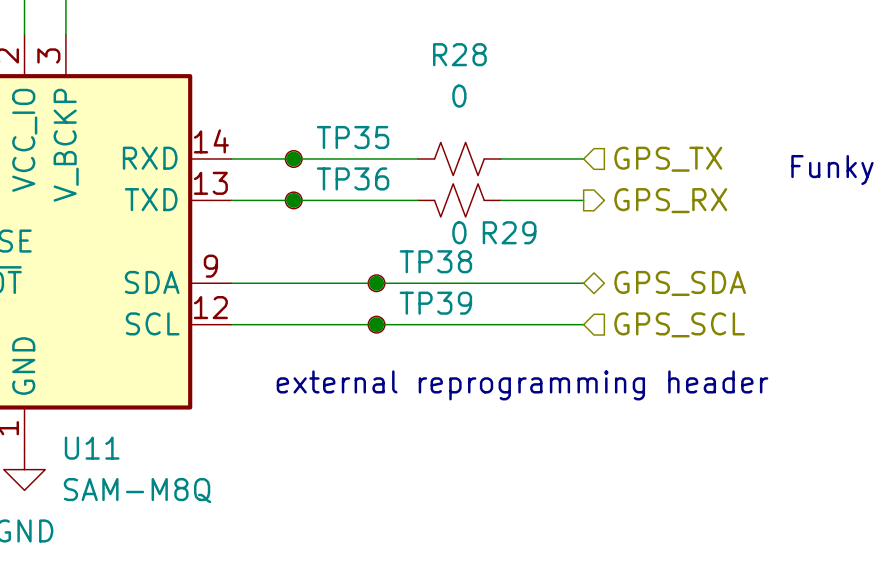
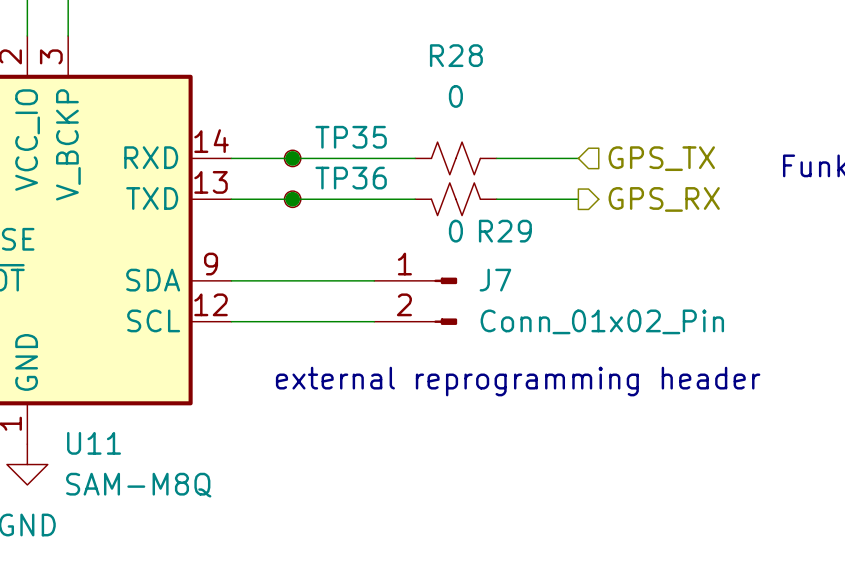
wire: (376, 283) (583, 283) -> none
junction: (376, 283) -> none
TP38: (376, 283) -> none
hierarchical label: GPS_SDA (680, 283) -> none
J7: none -> Conn_01x02_Pin (415, 301)
wire: (376, 324) (583, 324) -> none
junction: (376, 324) -> none
TP39: (376, 324) -> none
hierarchical label: GPS_SCL (679, 324) -> none

